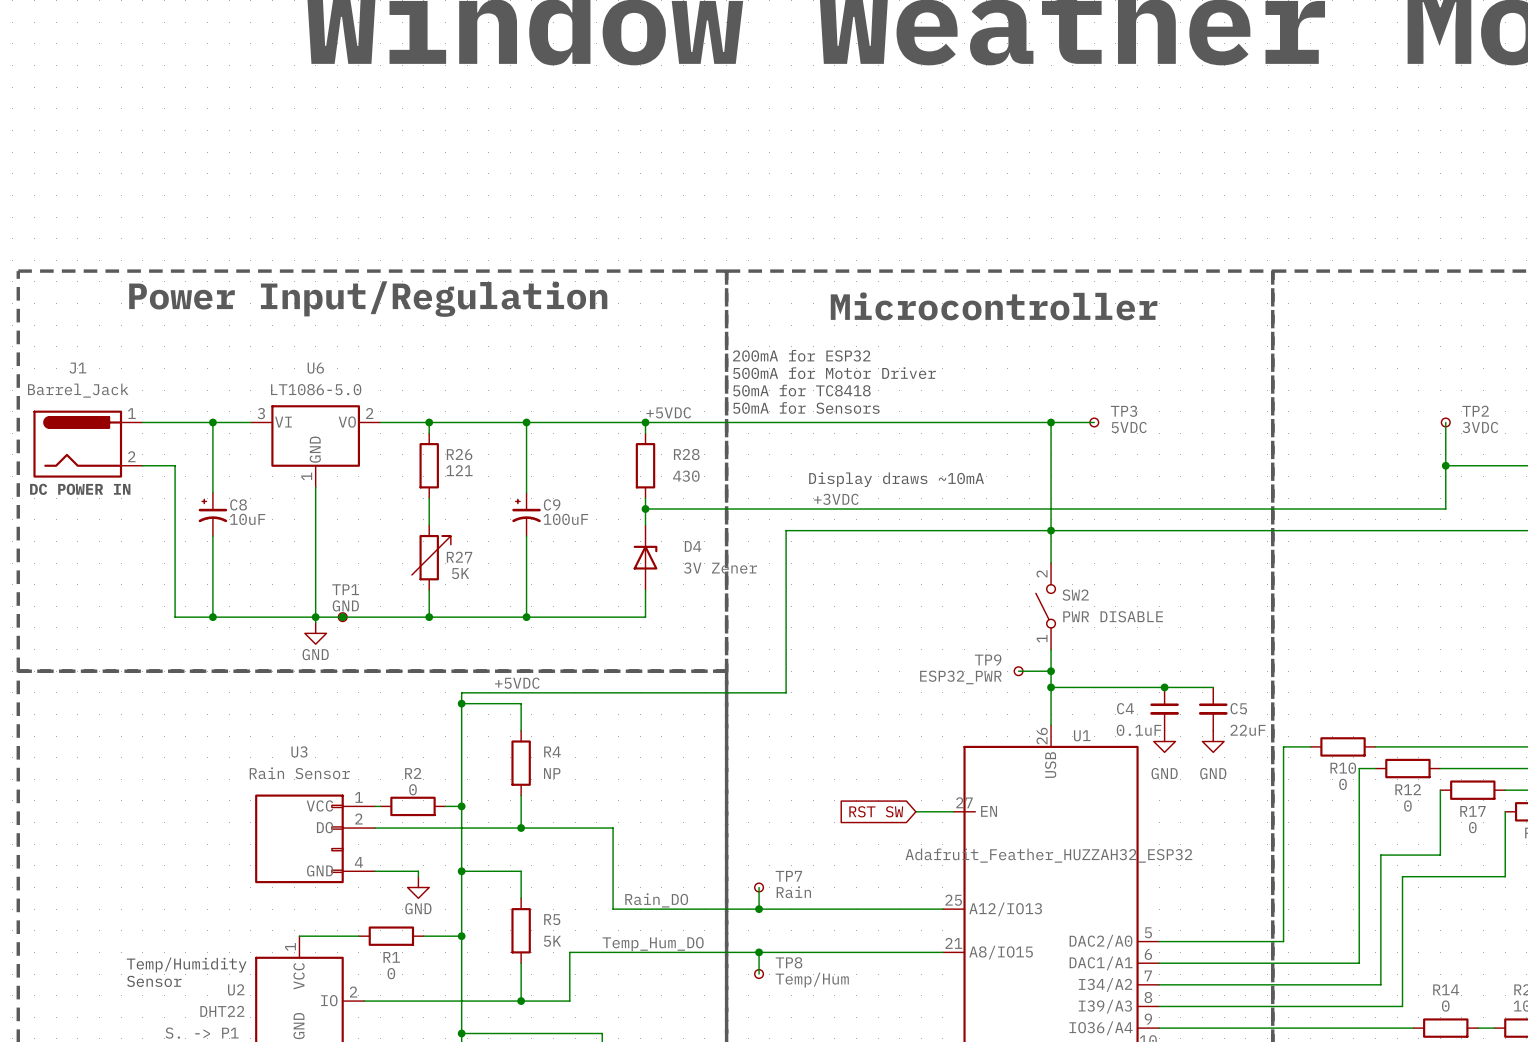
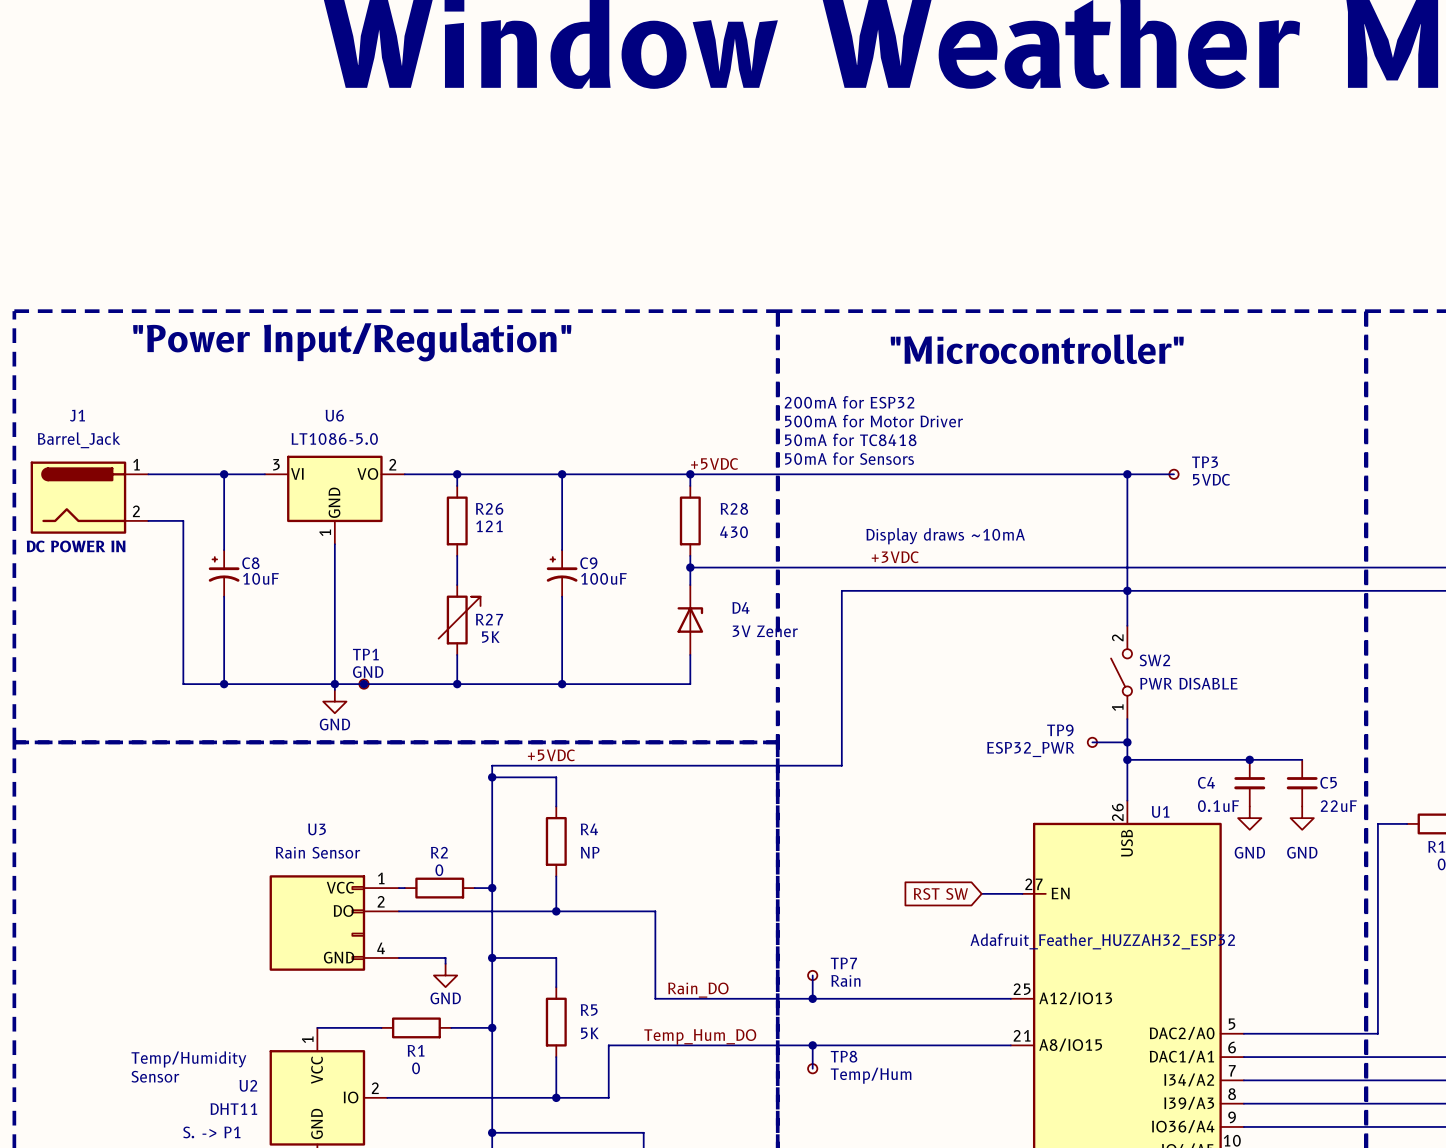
text: Power Input/Regulation (368, 299) -> "Power Input/Regulation" (352, 342)
text: Microcontroller (994, 306) -> "Microcontroller" (1037, 349)
U2 value: DHT22 (222, 1011) -> DHT11 (233, 1109)

